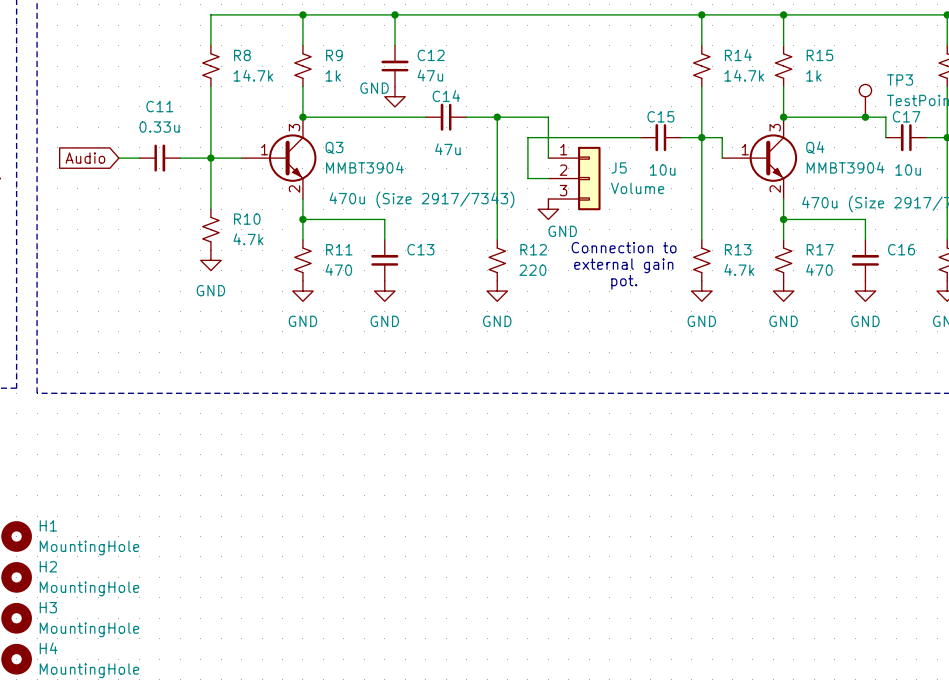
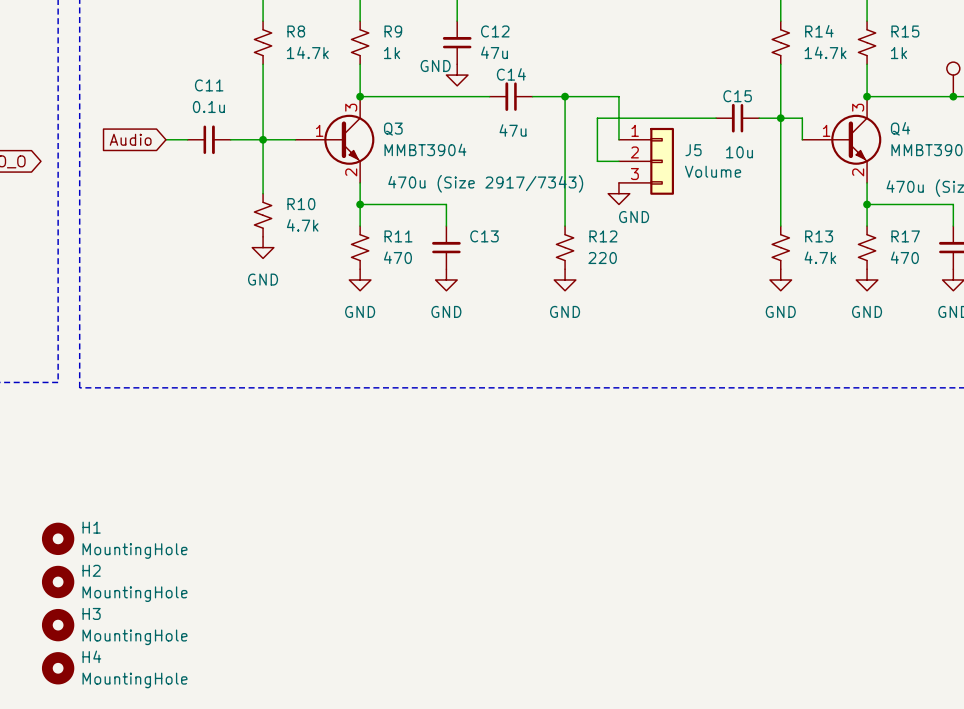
C11 value: 0.33u (159, 127) -> 0.1u (208, 107)
text: Connection to (624, 247) -> none
text: external gain (623, 265) -> none
text: pot. (624, 282) -> none

